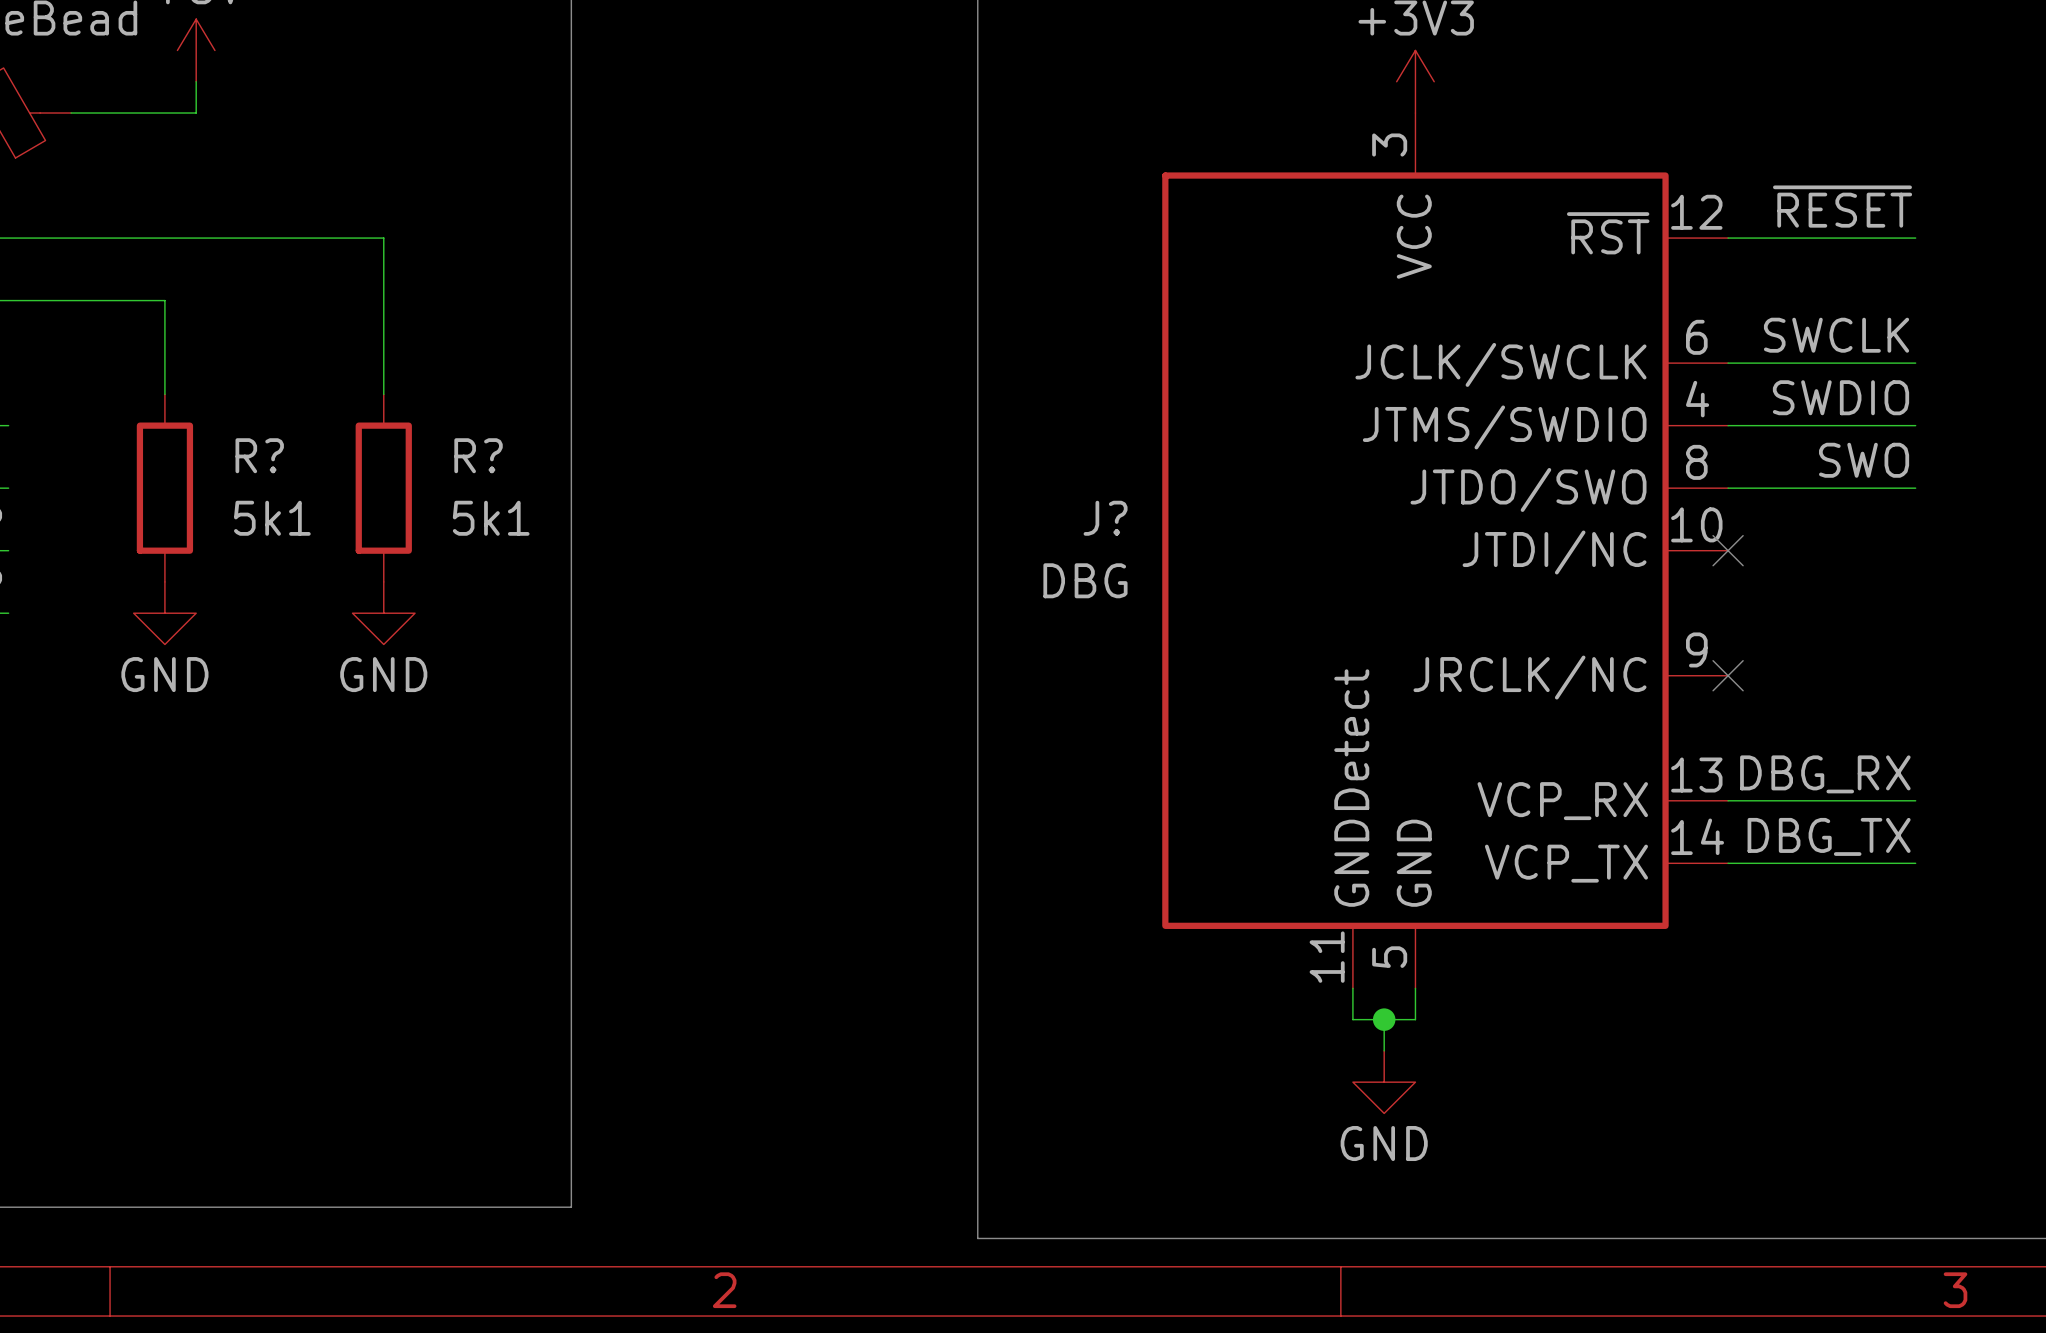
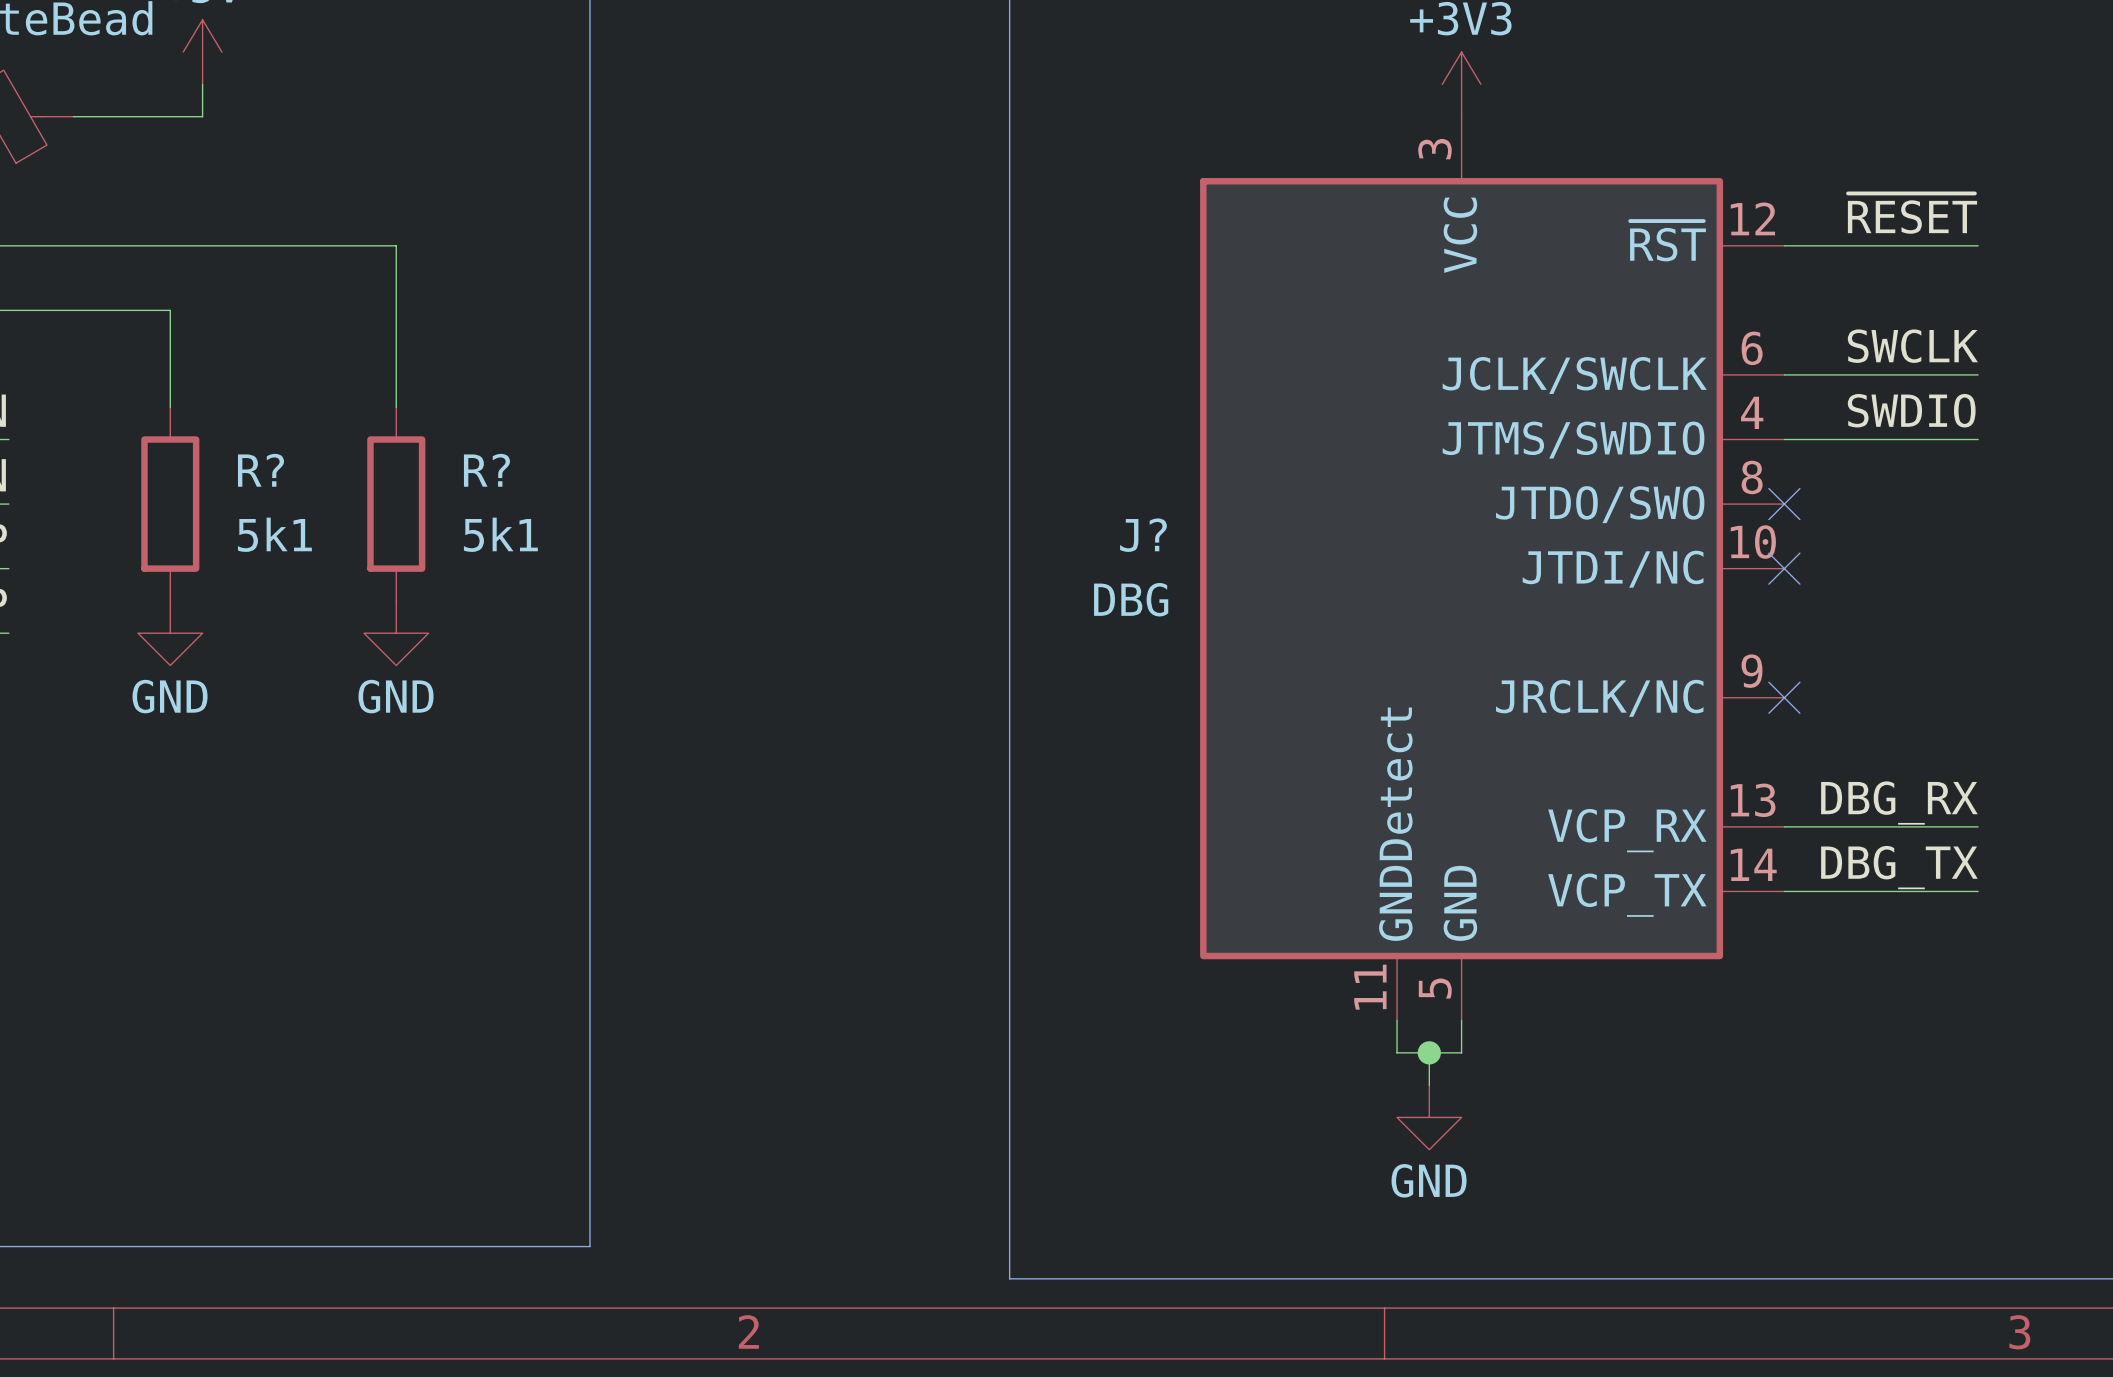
label: SWO (1864, 460) -> none
wire: (1728, 488) (1915, 488) -> none
no-connect mark: none -> (1784, 504)

